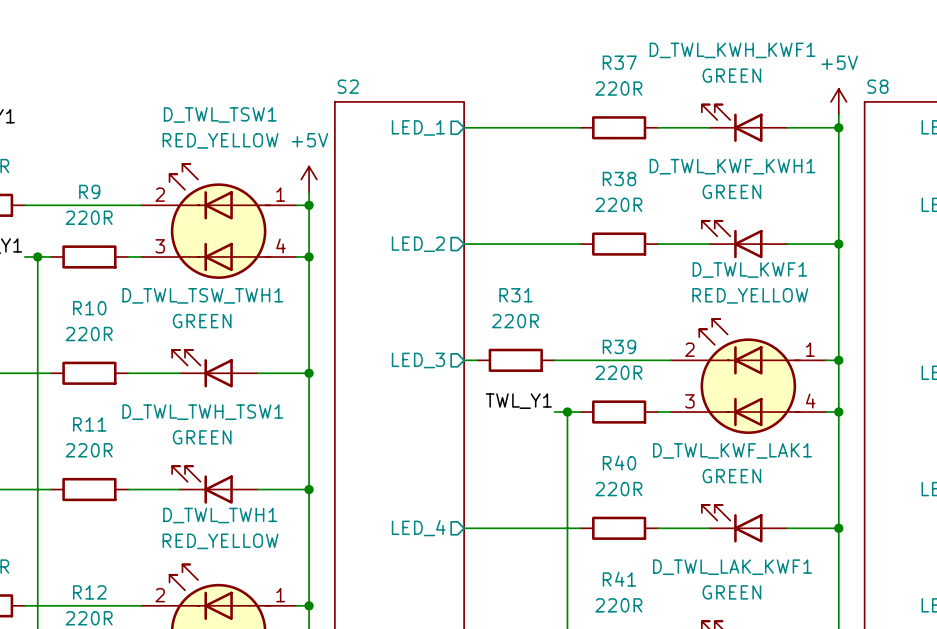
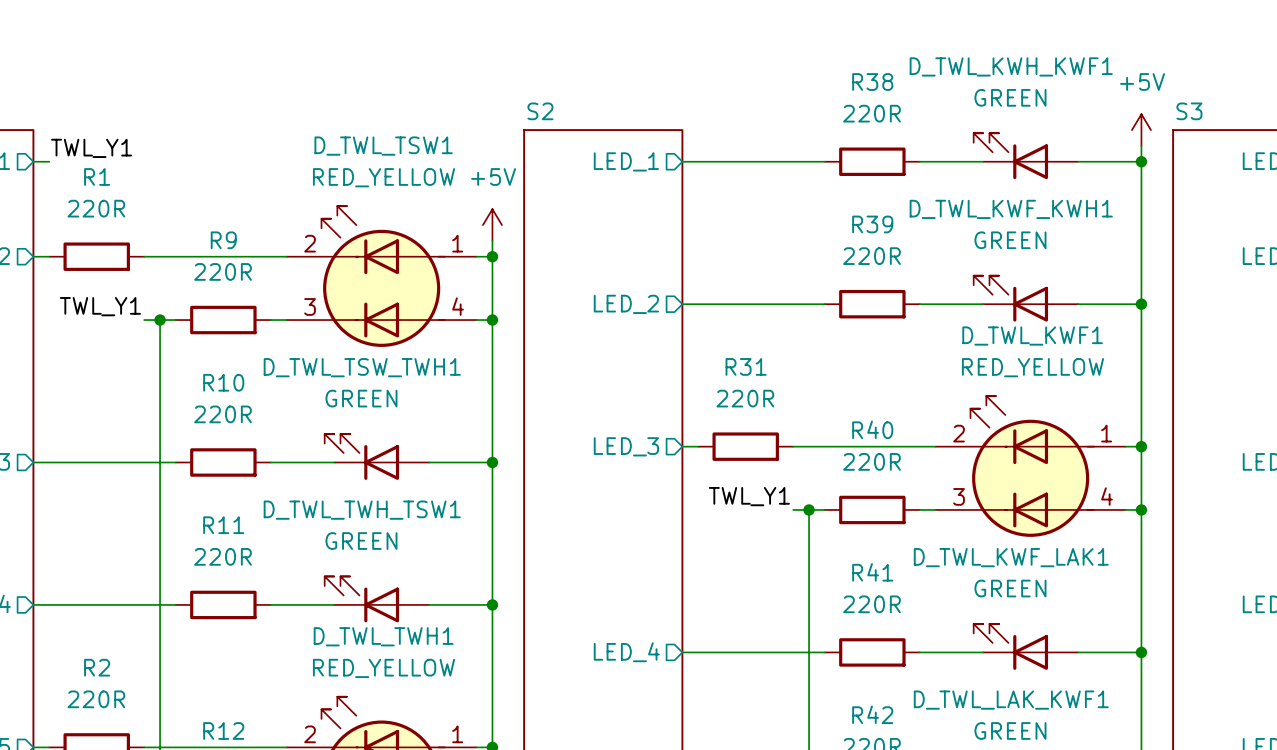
R37 name: R37 (619, 62) -> R38 (872, 82)
sheet S8 name: S8 (877, 86) -> S3 (1189, 111)
R38 name: R38 (619, 178) -> R39 (872, 224)
R39 name: R39 (619, 346) -> R40 (872, 429)
R40 name: R40 (619, 462) -> R41 (872, 572)
R41 name: R41 (619, 579) -> R42 (872, 714)

